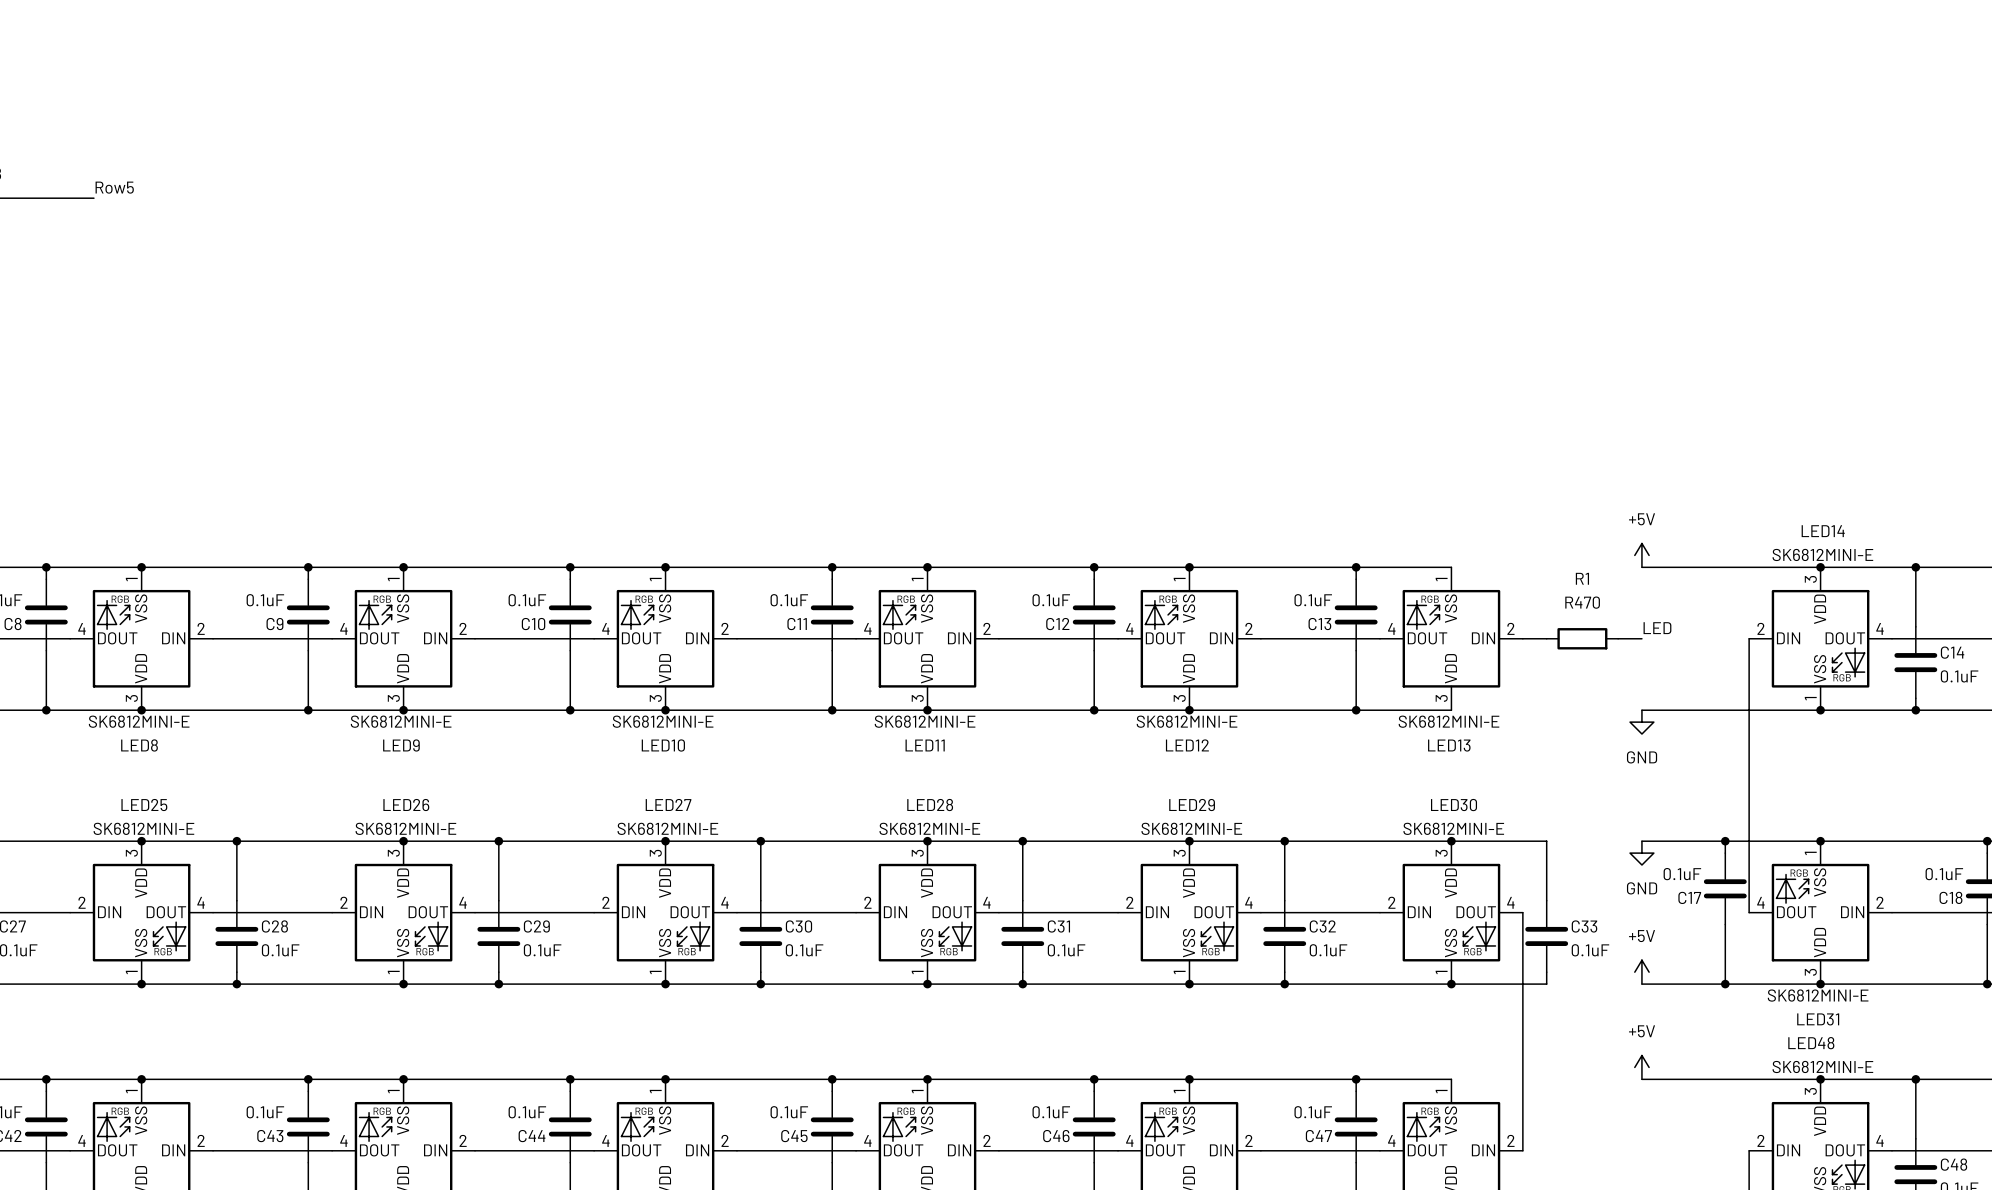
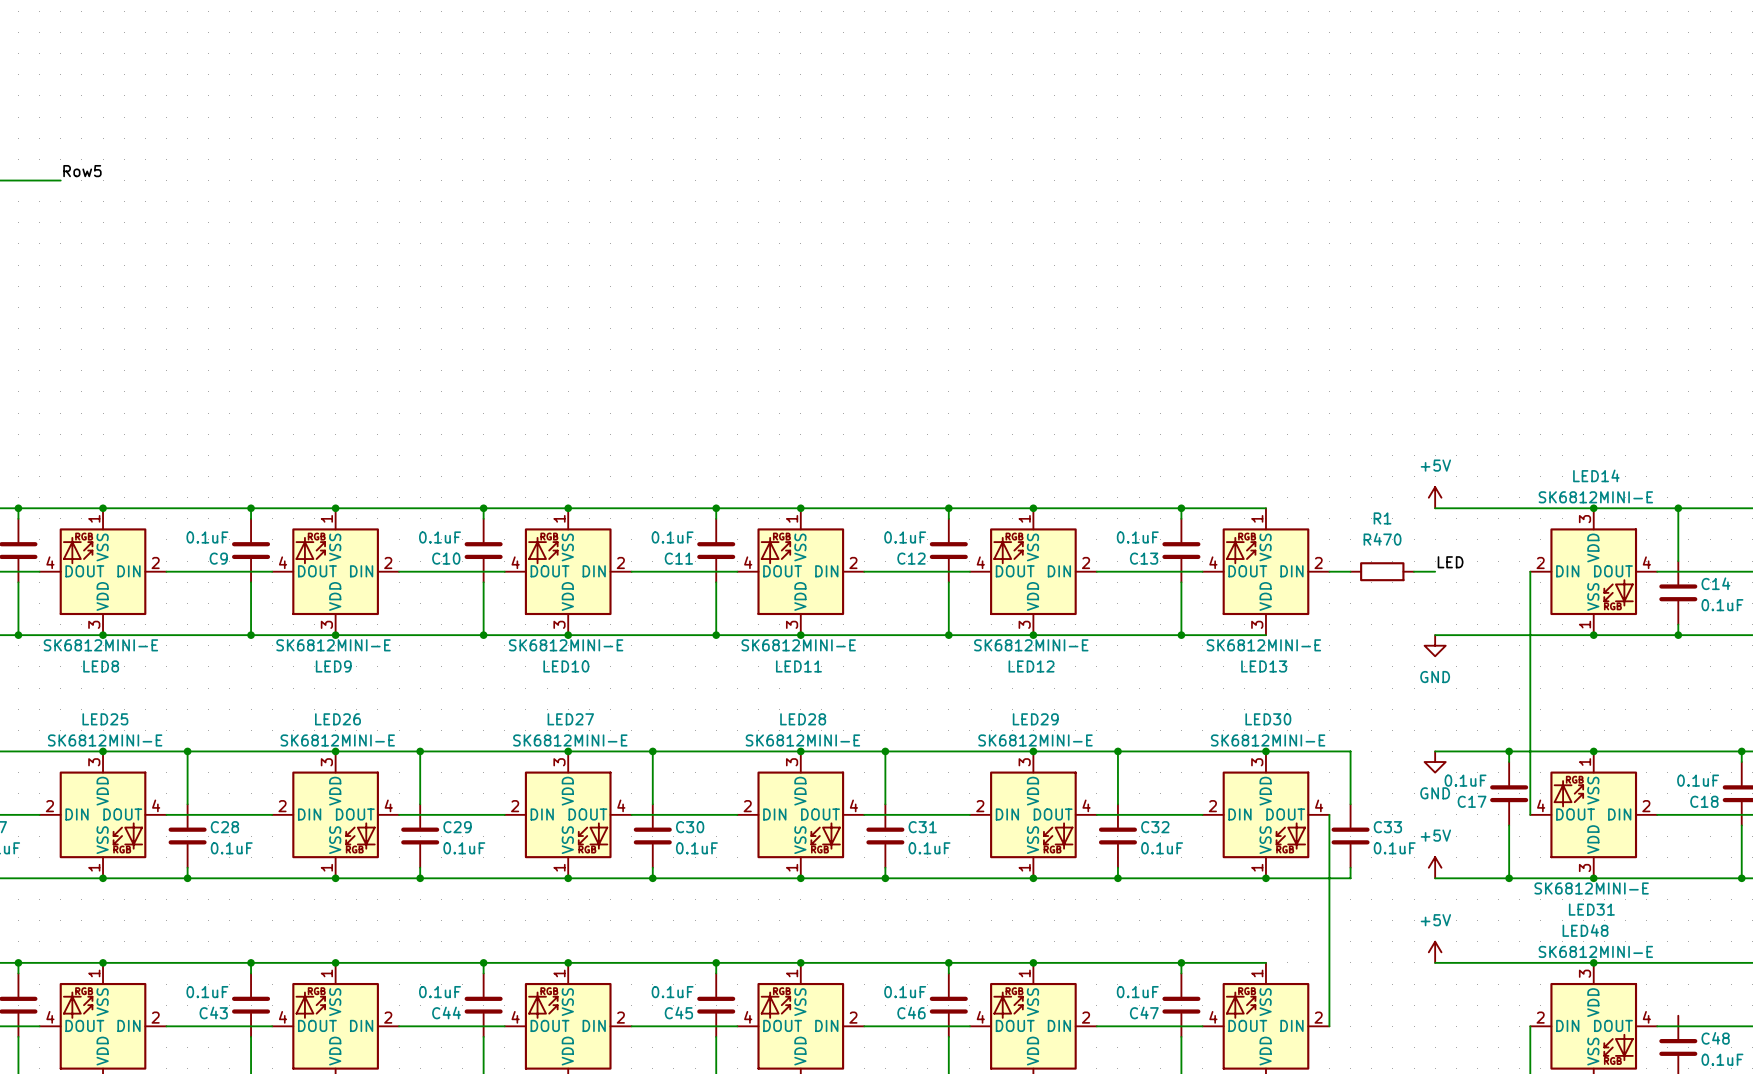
wire: (1915, 1079) (1915, 1138) -> none
junction: (1915, 1079) -> none

